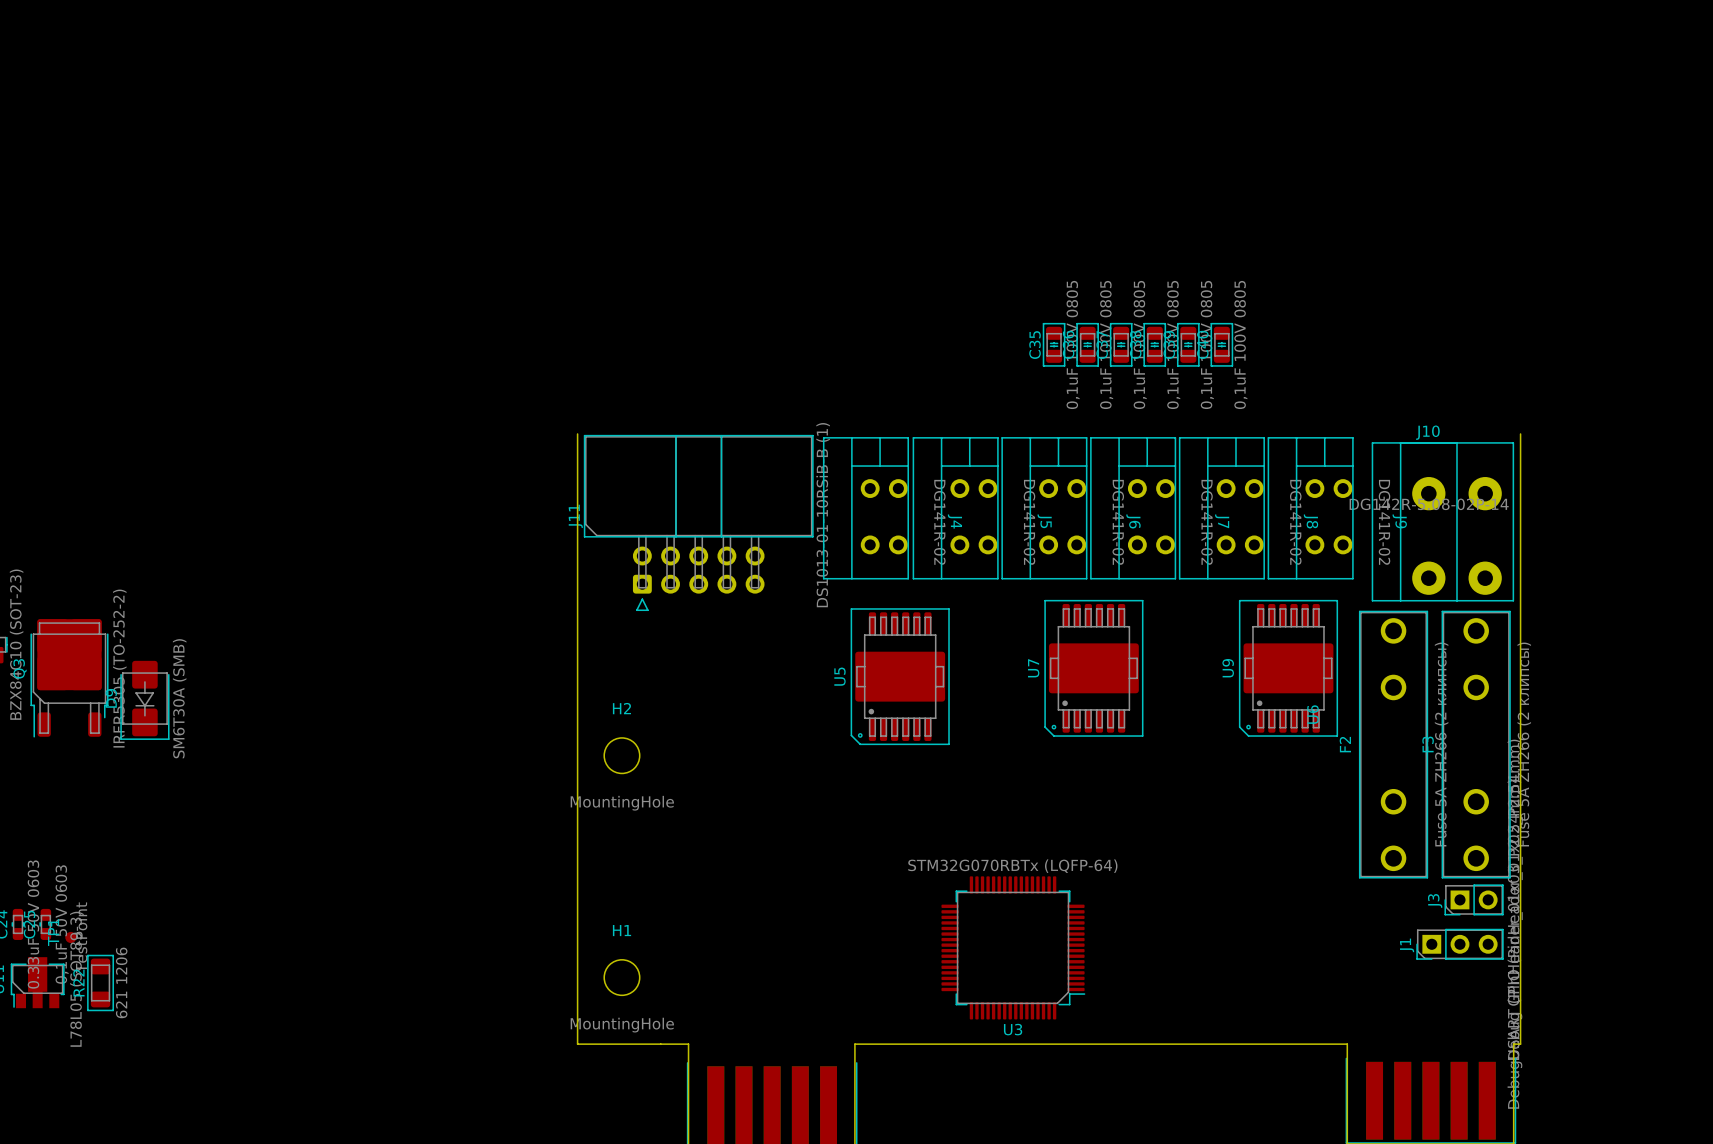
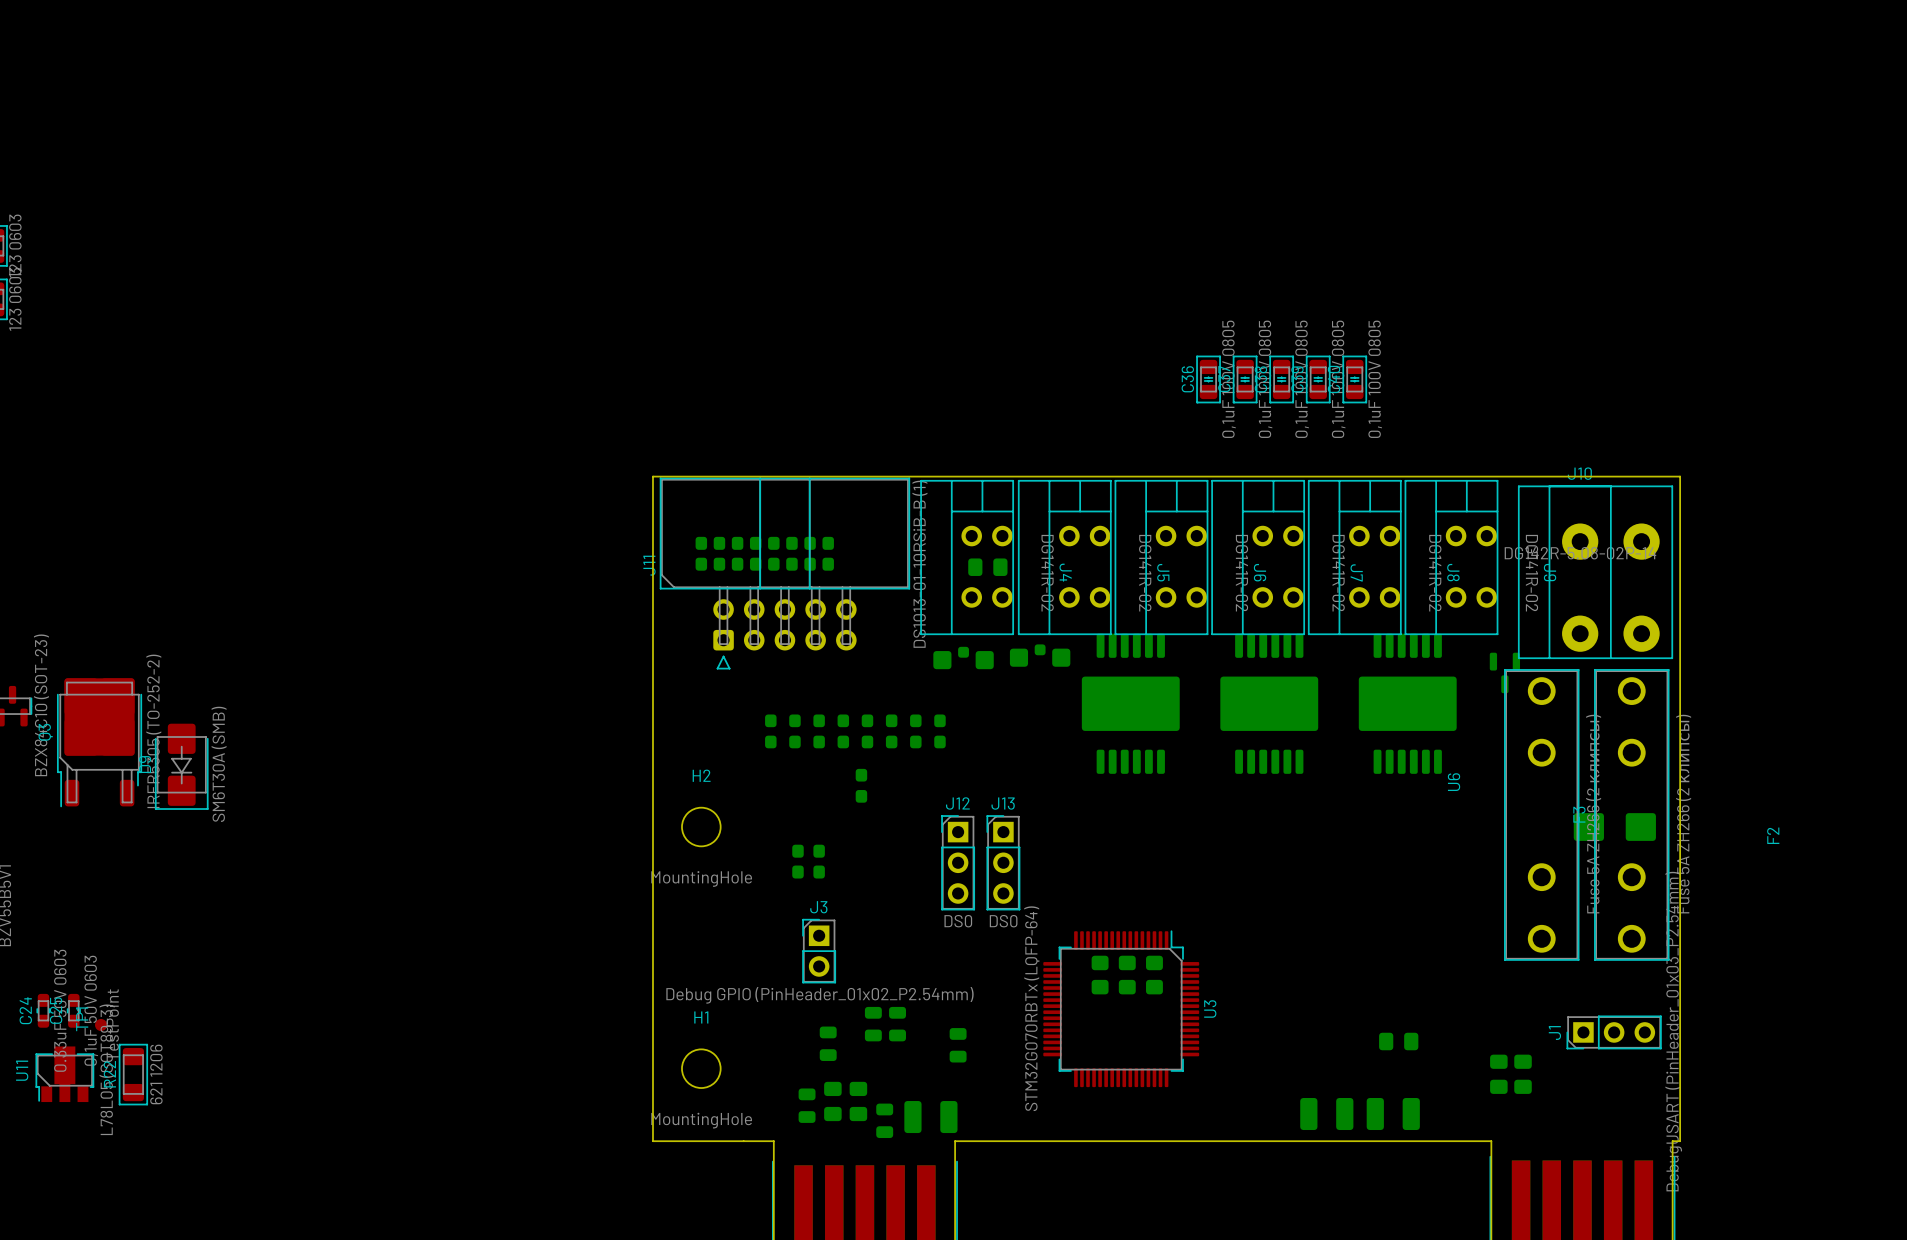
C35 side: top (1054, 344) -> bottom (987, 567)
board edge: none -> (652, 476) (1680, 476)
part: none -> (701, 553)
part: none -> (719, 553)
part: none -> (737, 553)
part: none -> (755, 553)
part: none -> (773, 553)
part: none -> (791, 553)
part: none -> (810, 553)
part: none -> (828, 553)
part: none -> (1040, 655)
part: none -> (963, 657)
part: none -> (1504, 672)
part: none -> (770, 731)
part: none -> (794, 731)
part: none -> (819, 731)
part: none -> (843, 731)
part: none -> (867, 731)
part: none -> (891, 731)
part: none -> (915, 731)
part: none -> (939, 731)
U7 side: top (1093, 668) -> bottom (1269, 703)
U9 side: top (1288, 668) -> bottom (1407, 703)
U5 side: top (900, 676) -> bottom (1130, 703)
part: none -> (861, 785)
F2 name position: F2 (1345, 744) -> F2 (1773, 835)
part: none -> (1614, 827)
part: none -> (797, 861)
part: none -> (819, 861)
J12: none -> DS0 (958, 862)
J13: none -> DS0 (1003, 862)
part: none -> (1100, 975)
part: none -> (1127, 975)
part: none -> (1154, 975)
J3 rotation: 0° (1474, 899) -> 90° clockwise (819, 951)
J3 position: (1474, 899) -> (819, 951)
part: none -> (873, 1024)
part: none -> (897, 1024)
U3 rotation: 0° (1013, 947) -> 90° counterclockwise (1121, 1008)
part: none -> (1398, 1041)
part: none -> (828, 1043)
part: none -> (958, 1045)
part: none -> (1498, 1074)
part: none -> (1523, 1074)
part: none -> (832, 1101)
part: none -> (858, 1101)
part: none -> (807, 1105)
part: none -> (1326, 1114)
part: none -> (1393, 1114)
part: none -> (930, 1117)
part: none -> (884, 1120)

